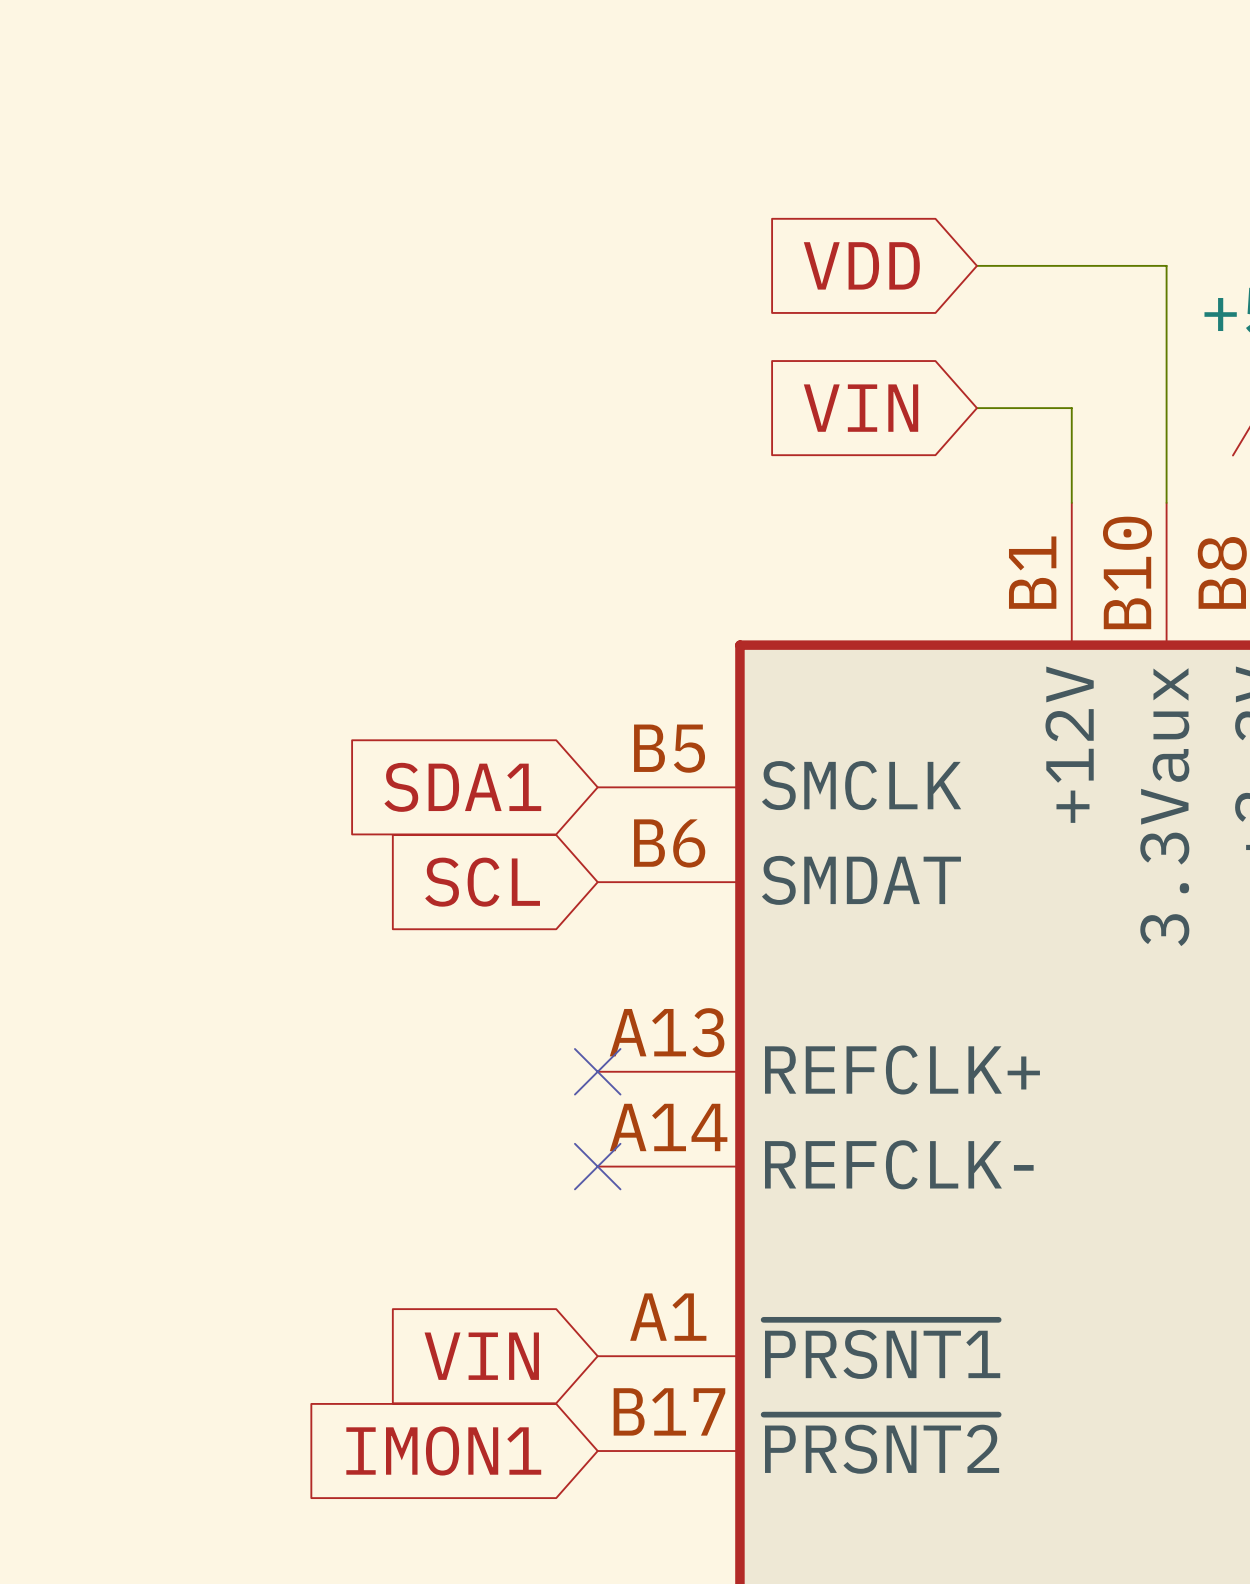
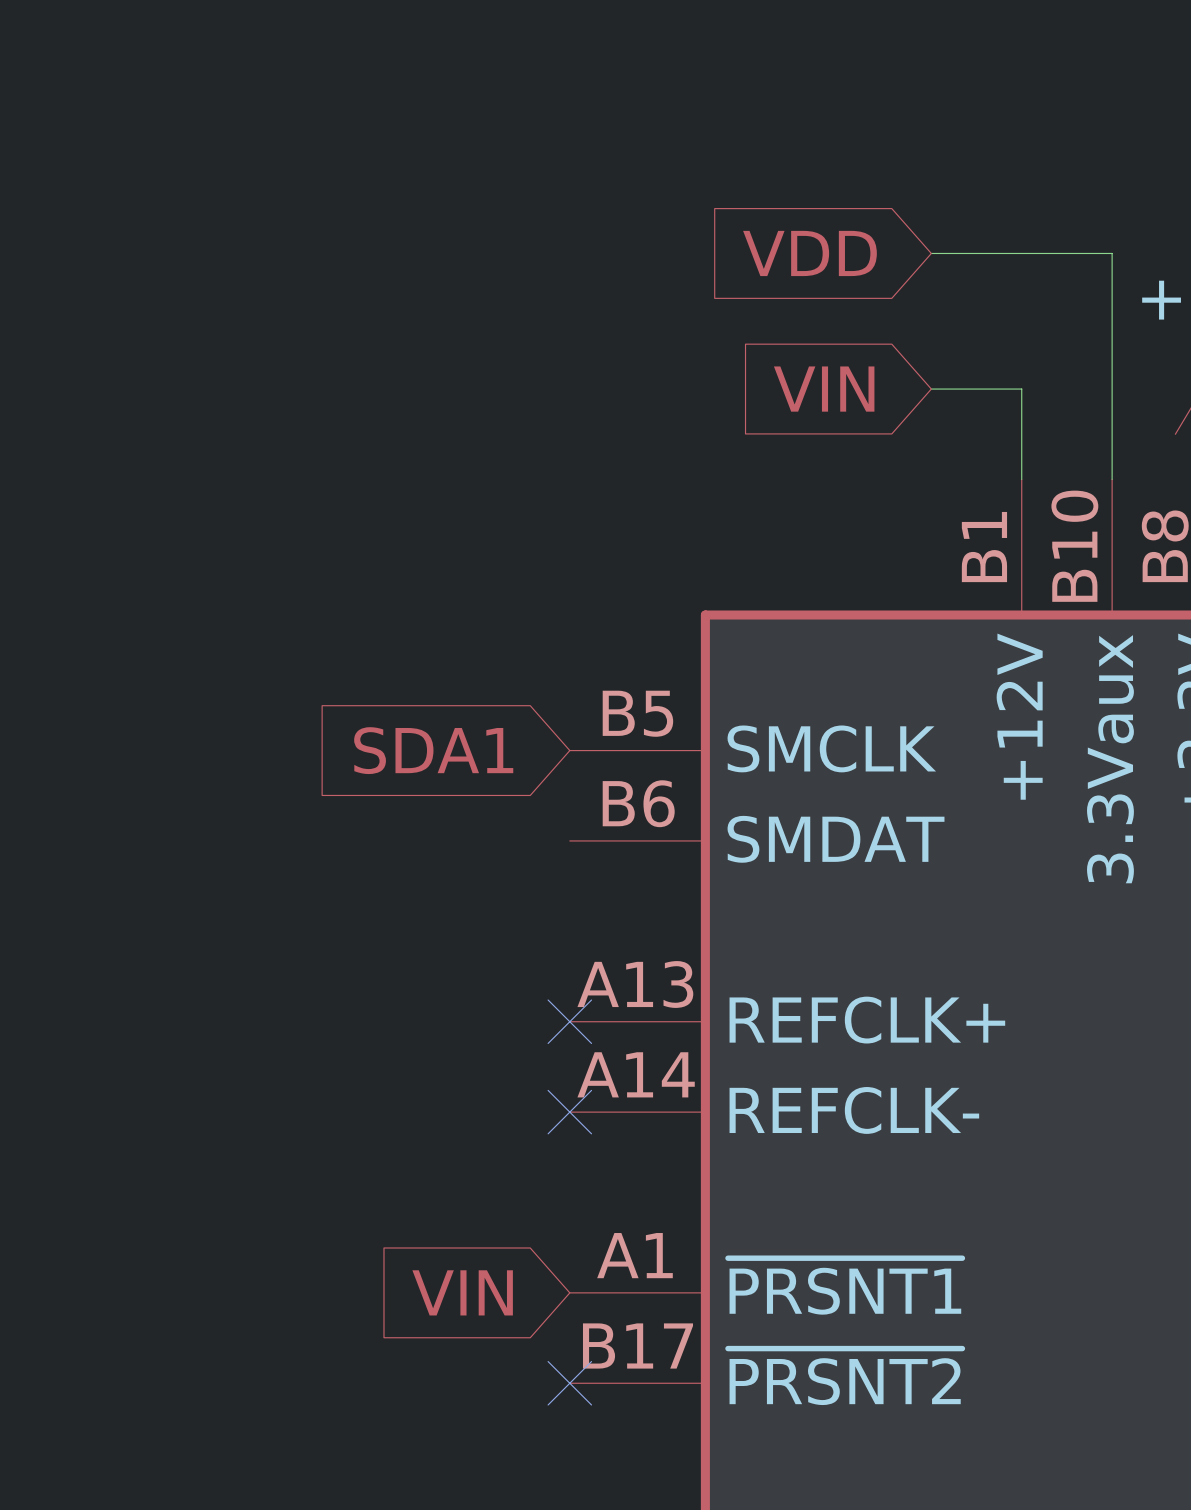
global label: SCL (482, 882) -> none
global label: IMON1 (443, 1451) -> none
no-connect mark: none -> (569, 1383)

